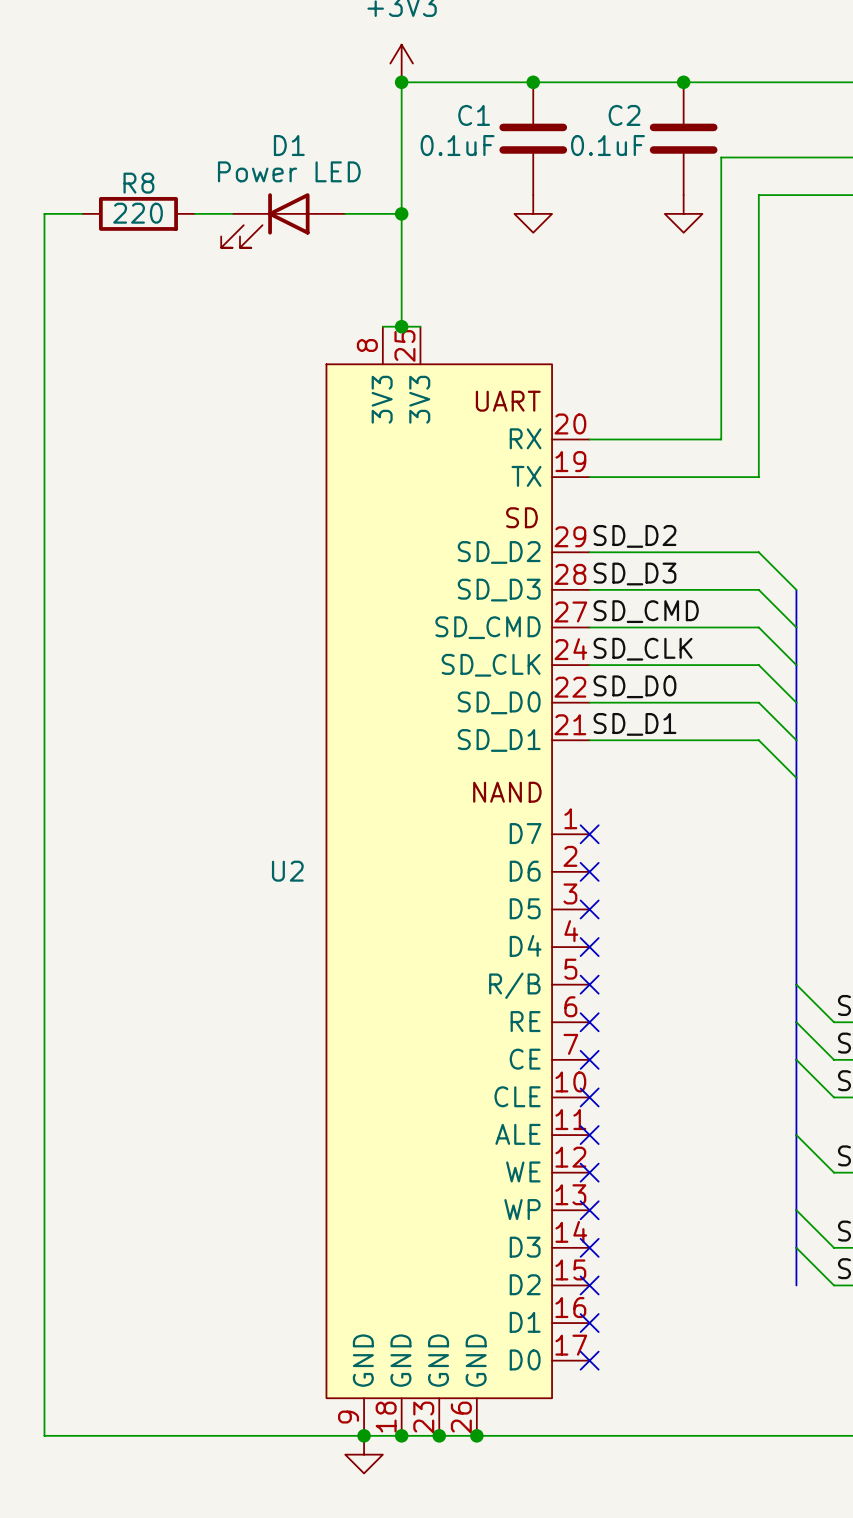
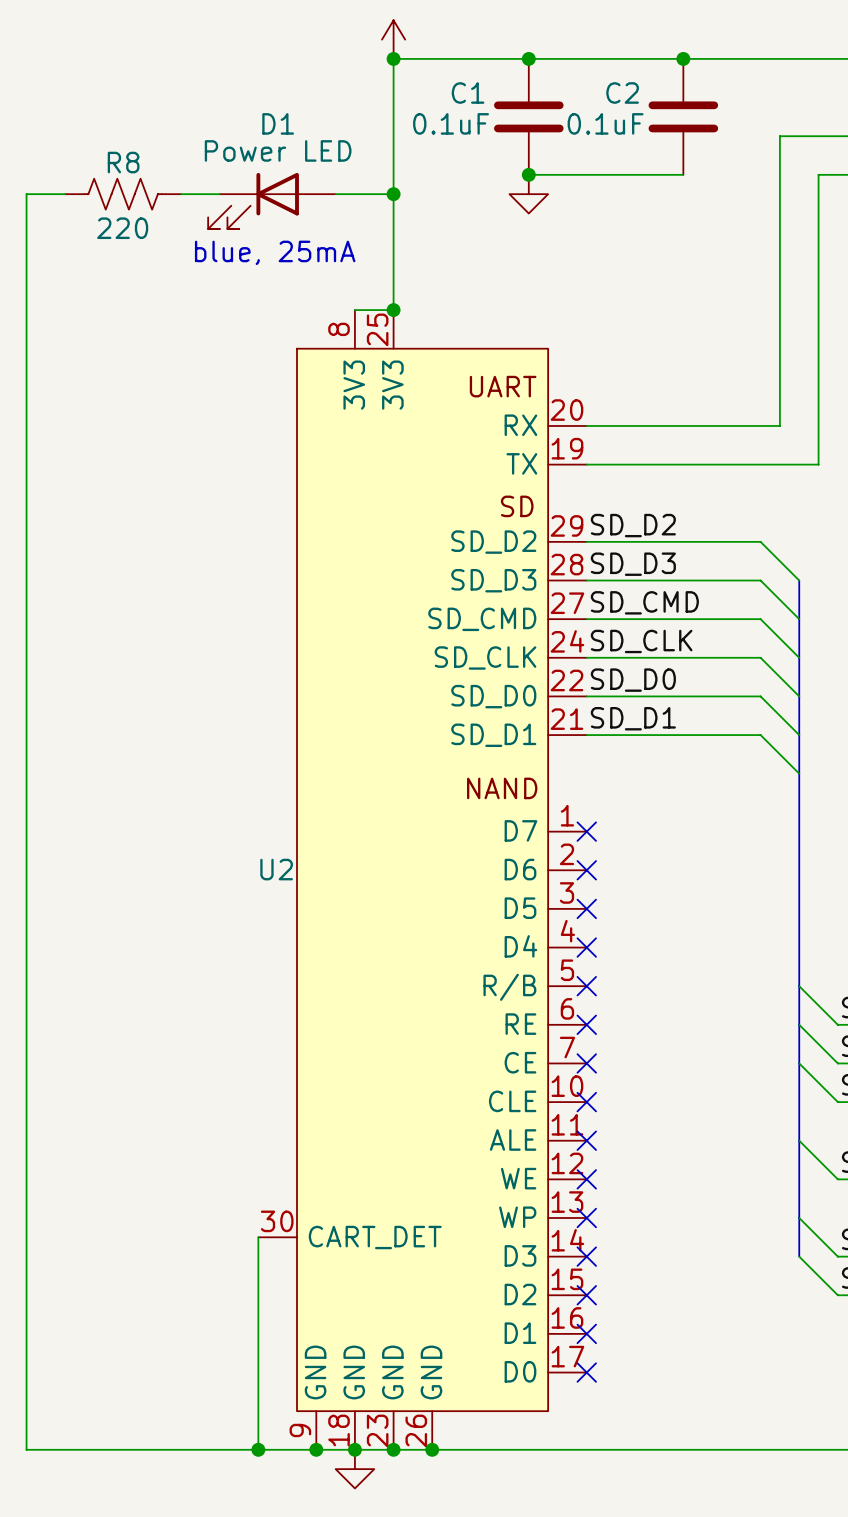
wire: (777, 157) (721, 157) (721, 439) -> (779, 136) (779, 425) (721, 425)
wire: none -> (528, 174) (683, 174)
junction: none -> (528, 174)
wire: (815, 195) (758, 195) (758, 477) -> (818, 174) (818, 464) (760, 464)
R8 symbol: [82, 196, 195, 231] -> [65, 178, 182, 210]
R8 value position: 220 (138, 213) -> 220 (122, 228)
power symbol: (683, 213) -> none
text: none -> blue, 25mA (275, 252)
U2 symbol: [326, 326, 590, 1436] -> [258, 310, 587, 1450]
wire: (401, 326) (420, 326) -> (354, 310) (374, 310)
wire: none -> (258, 1237) (258, 1449)
bus: (796, 1247) (796, 1285) -> none
junction: none -> (258, 1449)
junction: none -> (316, 1449)
junction: (476, 1435) -> none

